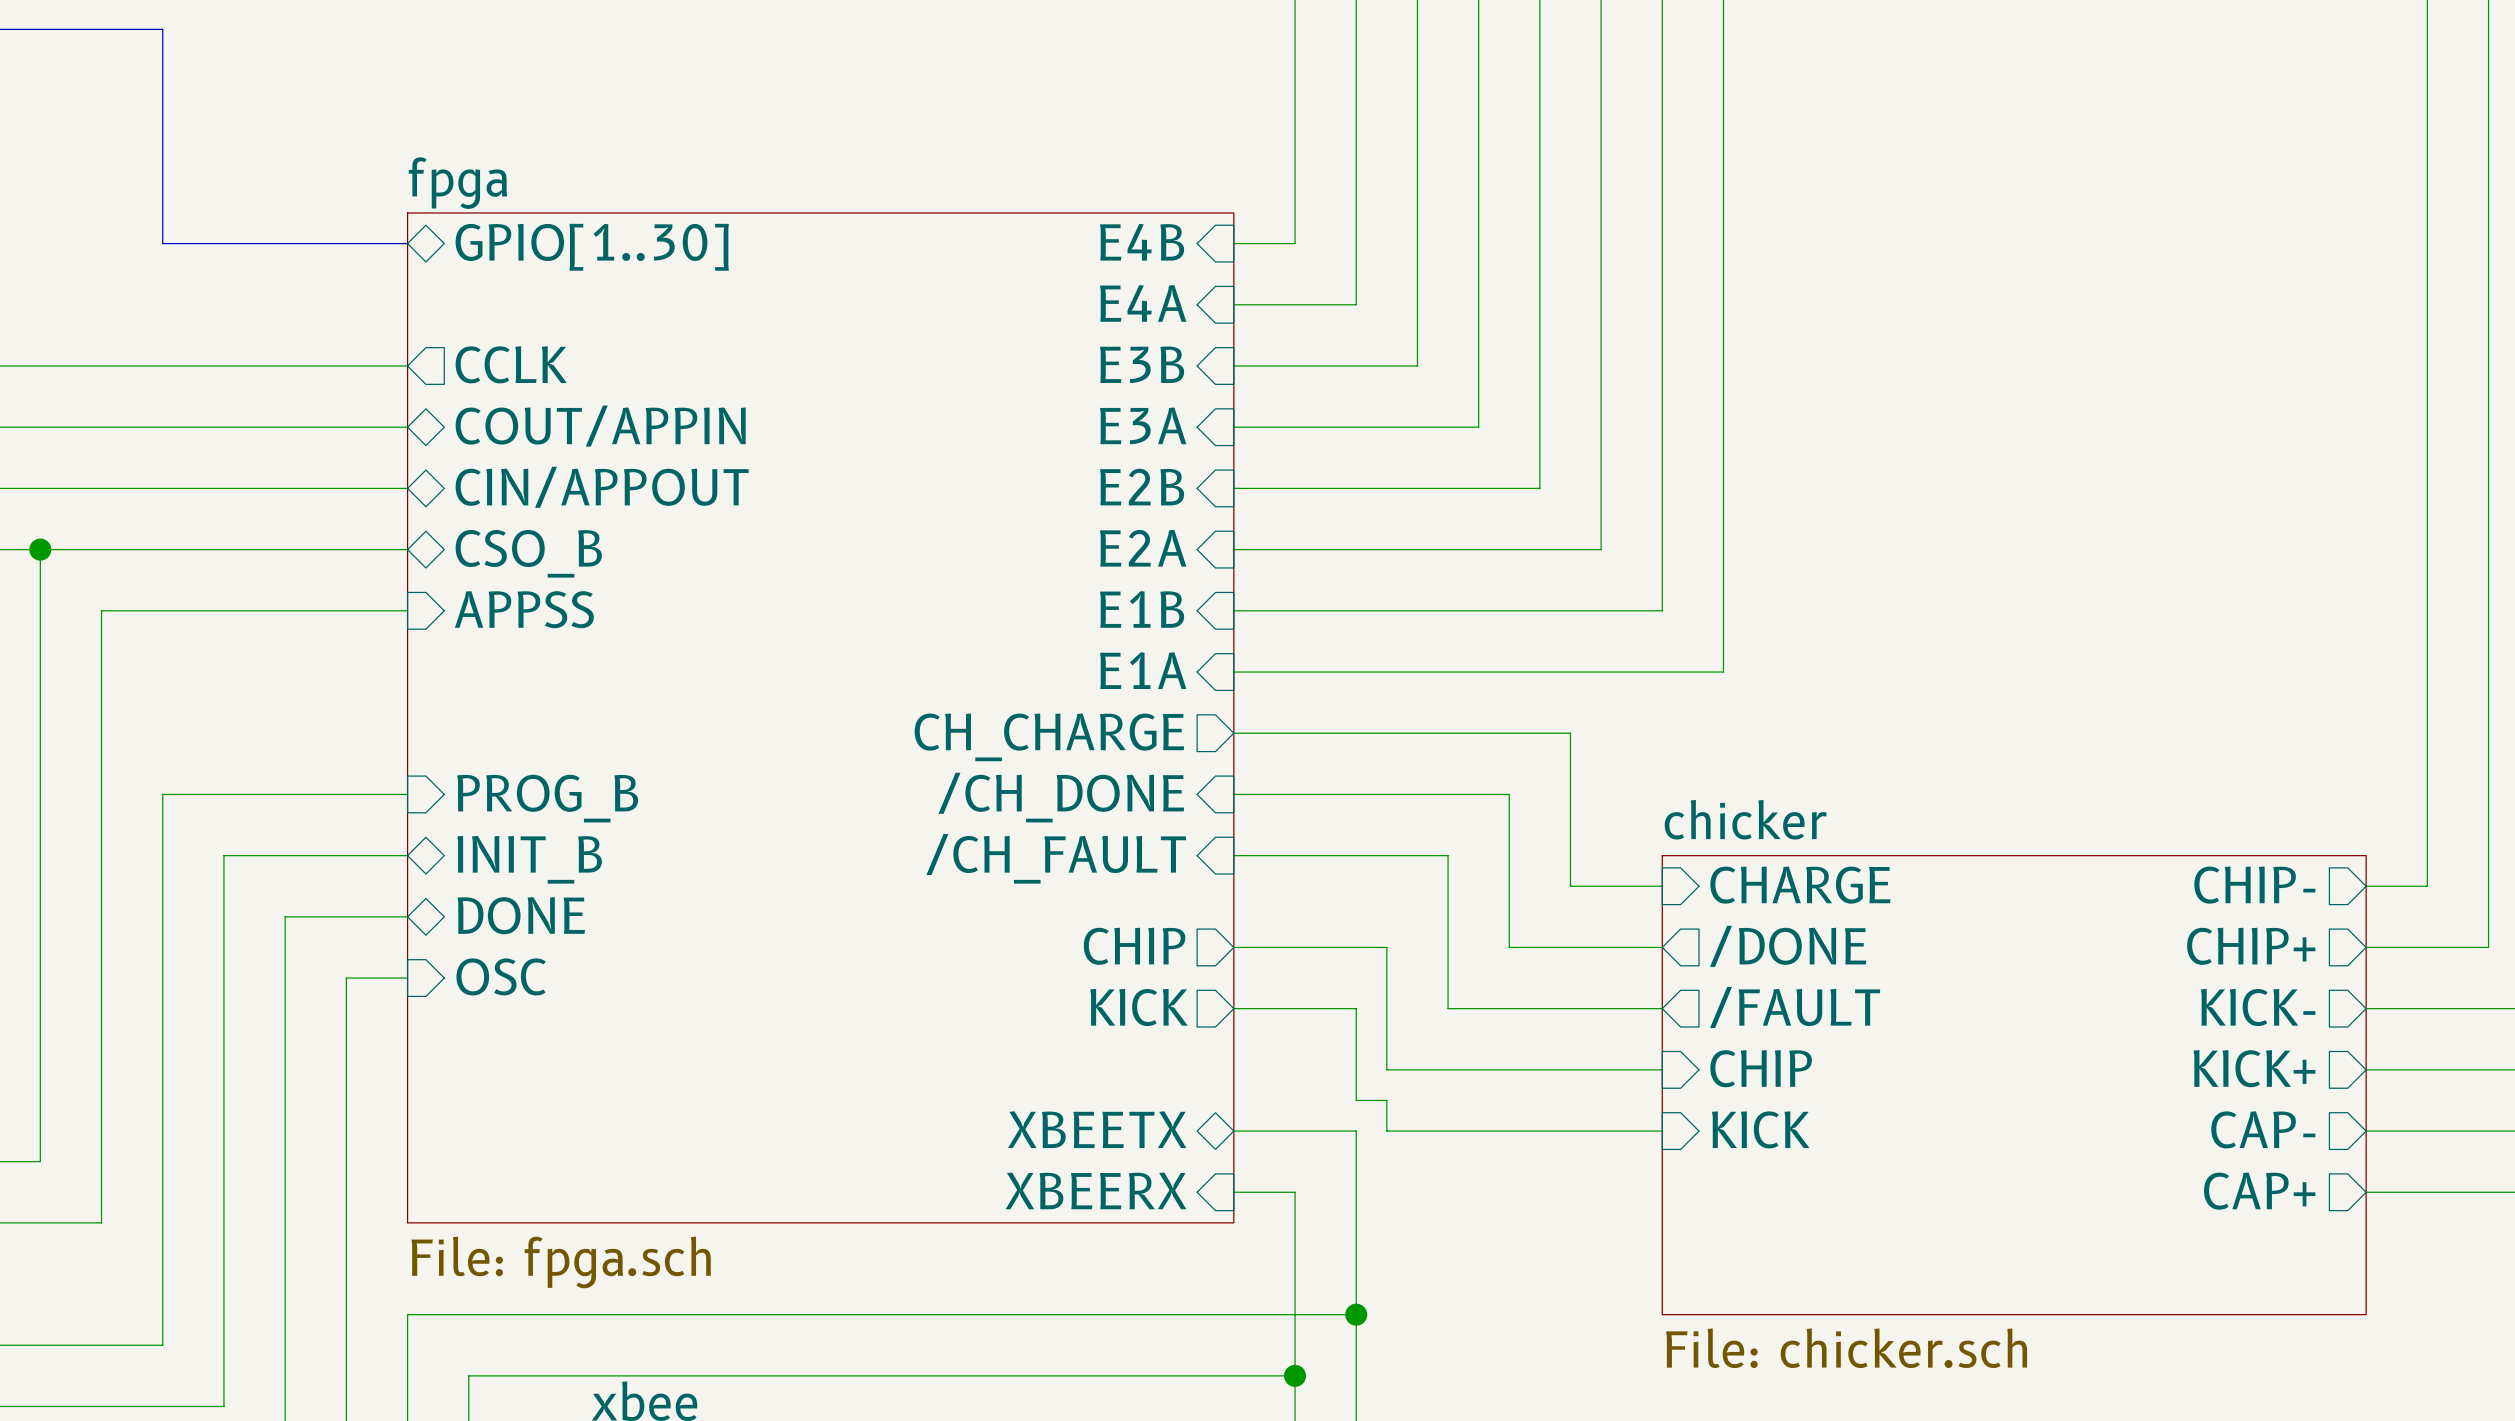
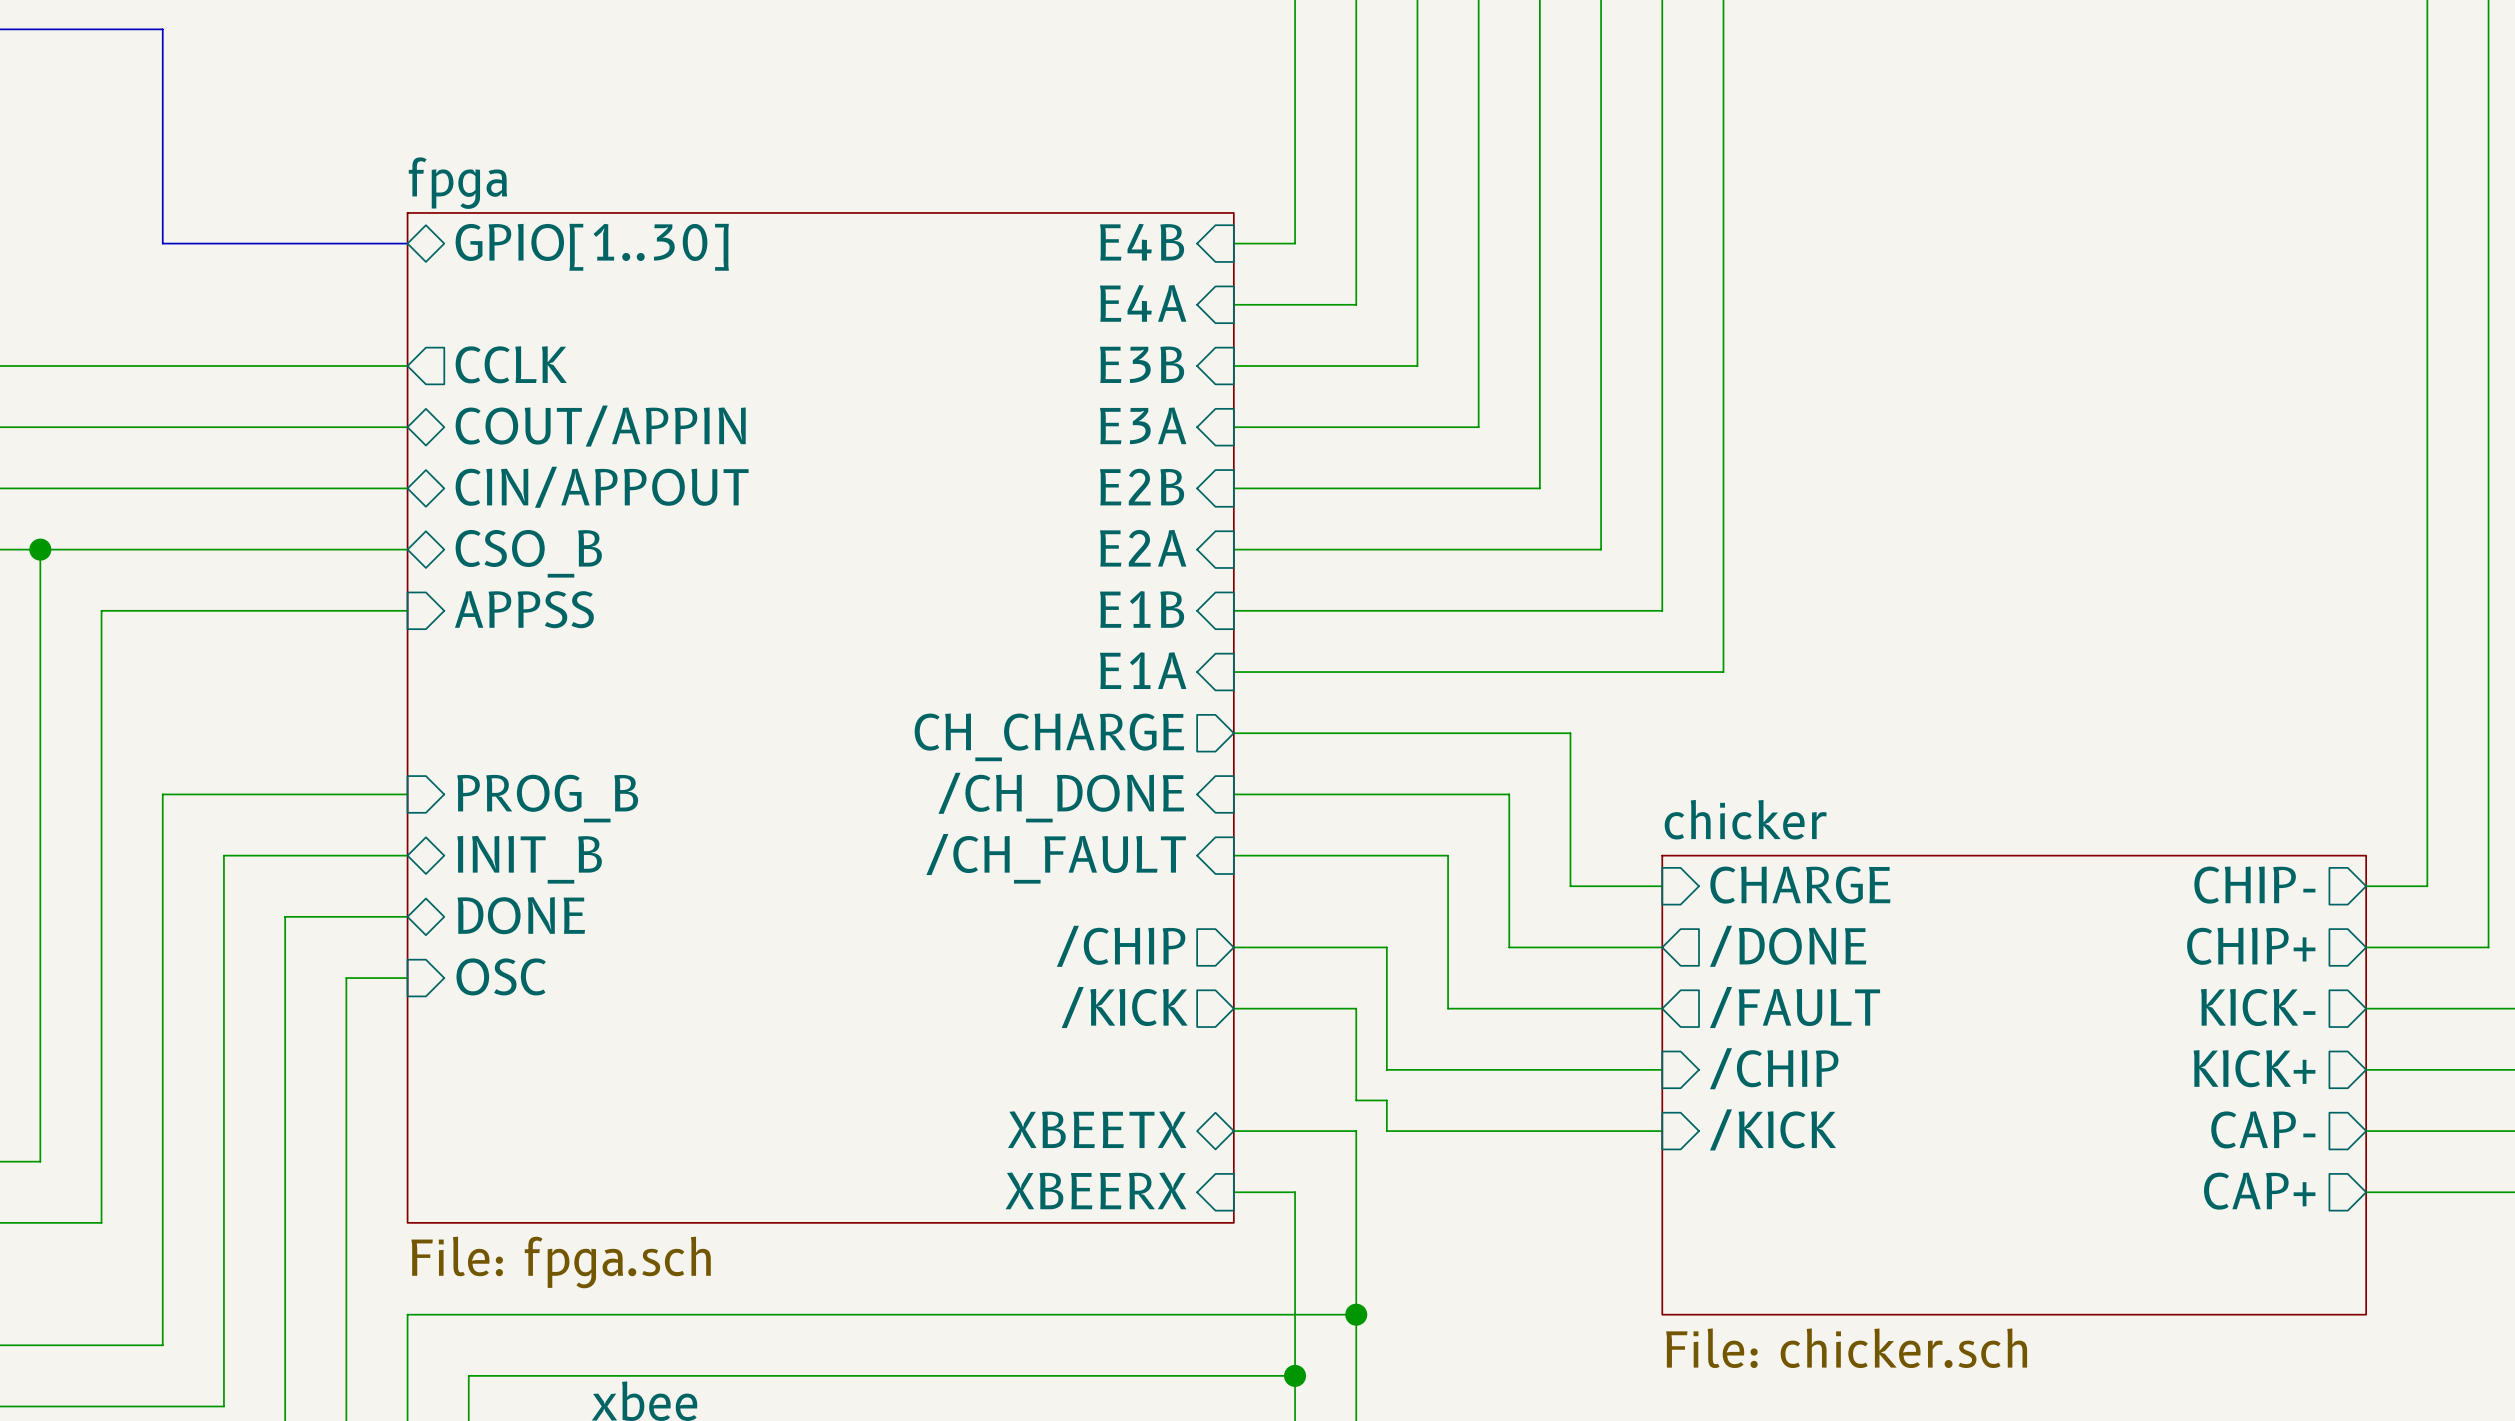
sheet pin: CHIP (1134, 946) -> /CHIP (1121, 946)
sheet pin: KICK (1139, 1007) -> /KICK (1124, 1007)
sheet pin: CHIP (1761, 1068) -> /CHIP (1774, 1068)
sheet pin: KICK (1760, 1129) -> /KICK (1772, 1129)

